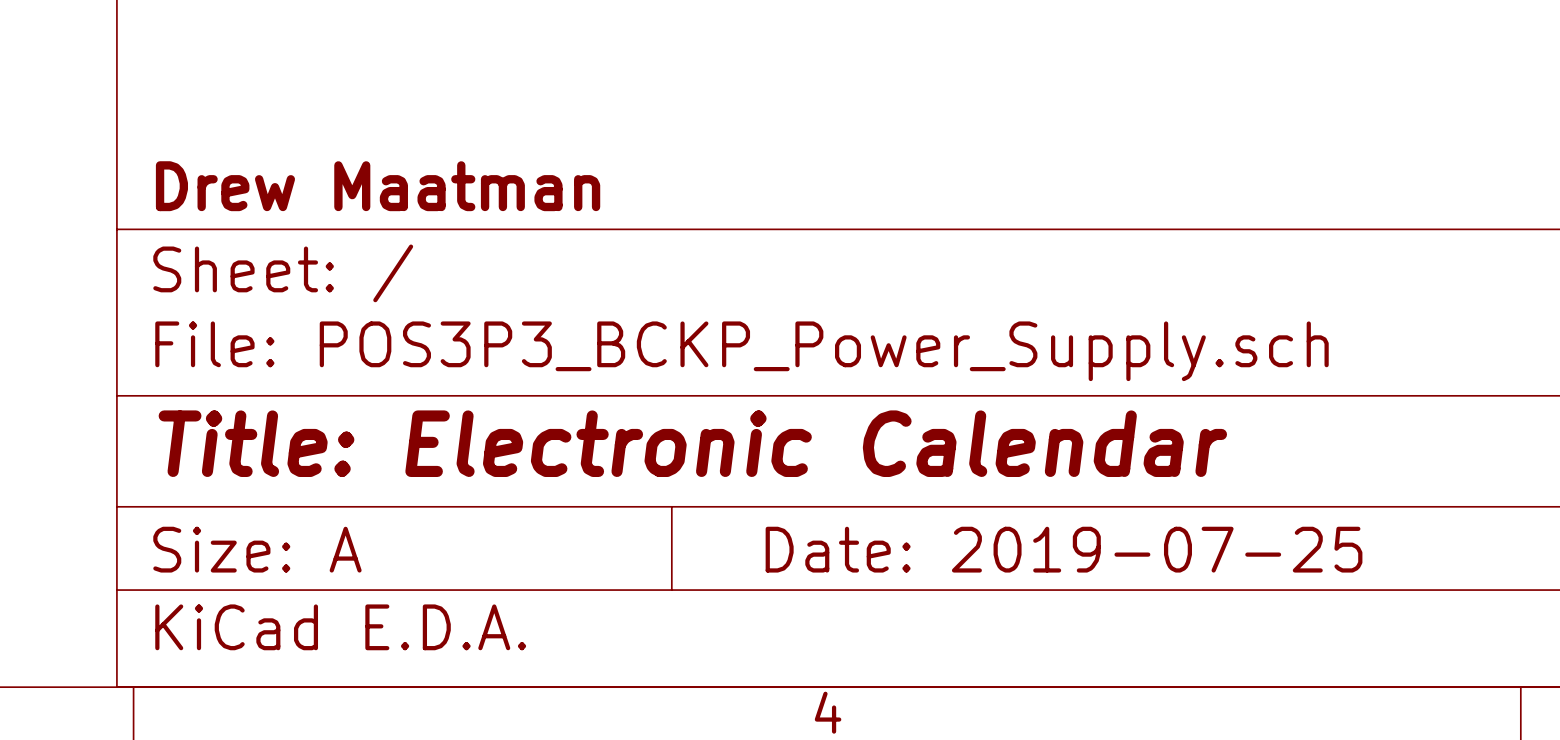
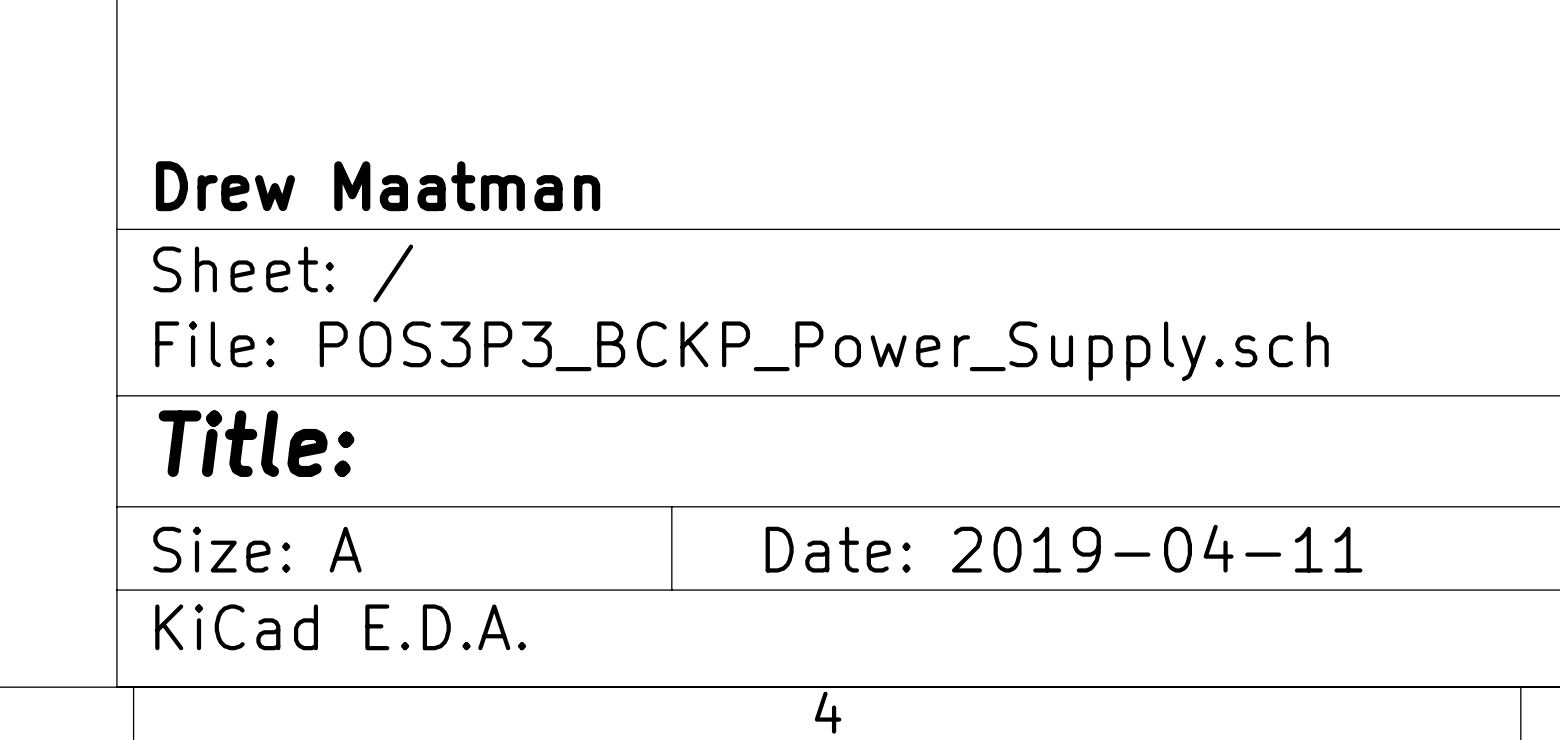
title block: Title: Electronic Calendar (692, 443) -> Title: (256, 443)
title block: Date: 2019-07-25 (1064, 549) -> Date: 2019-04-11 (1064, 548)

